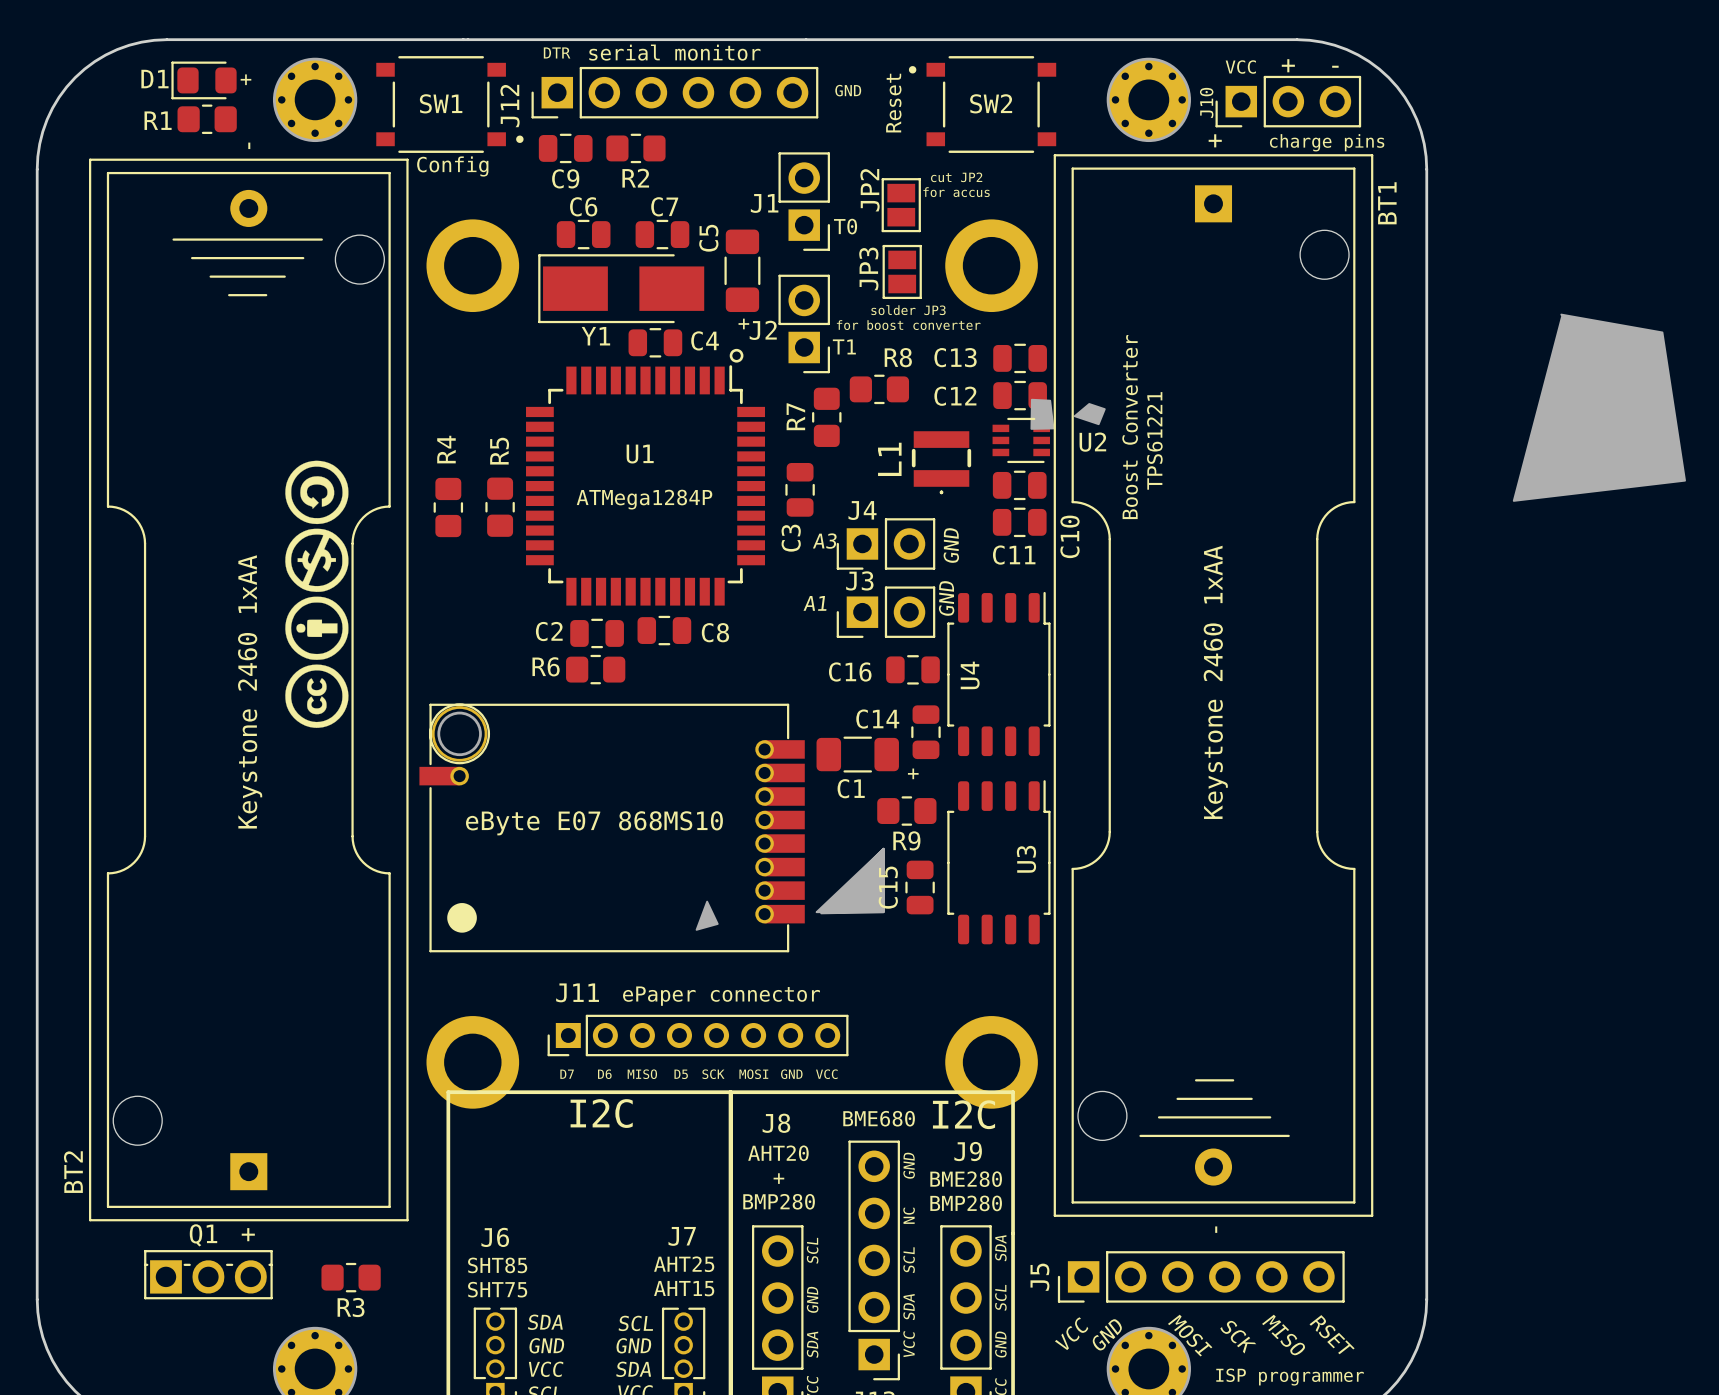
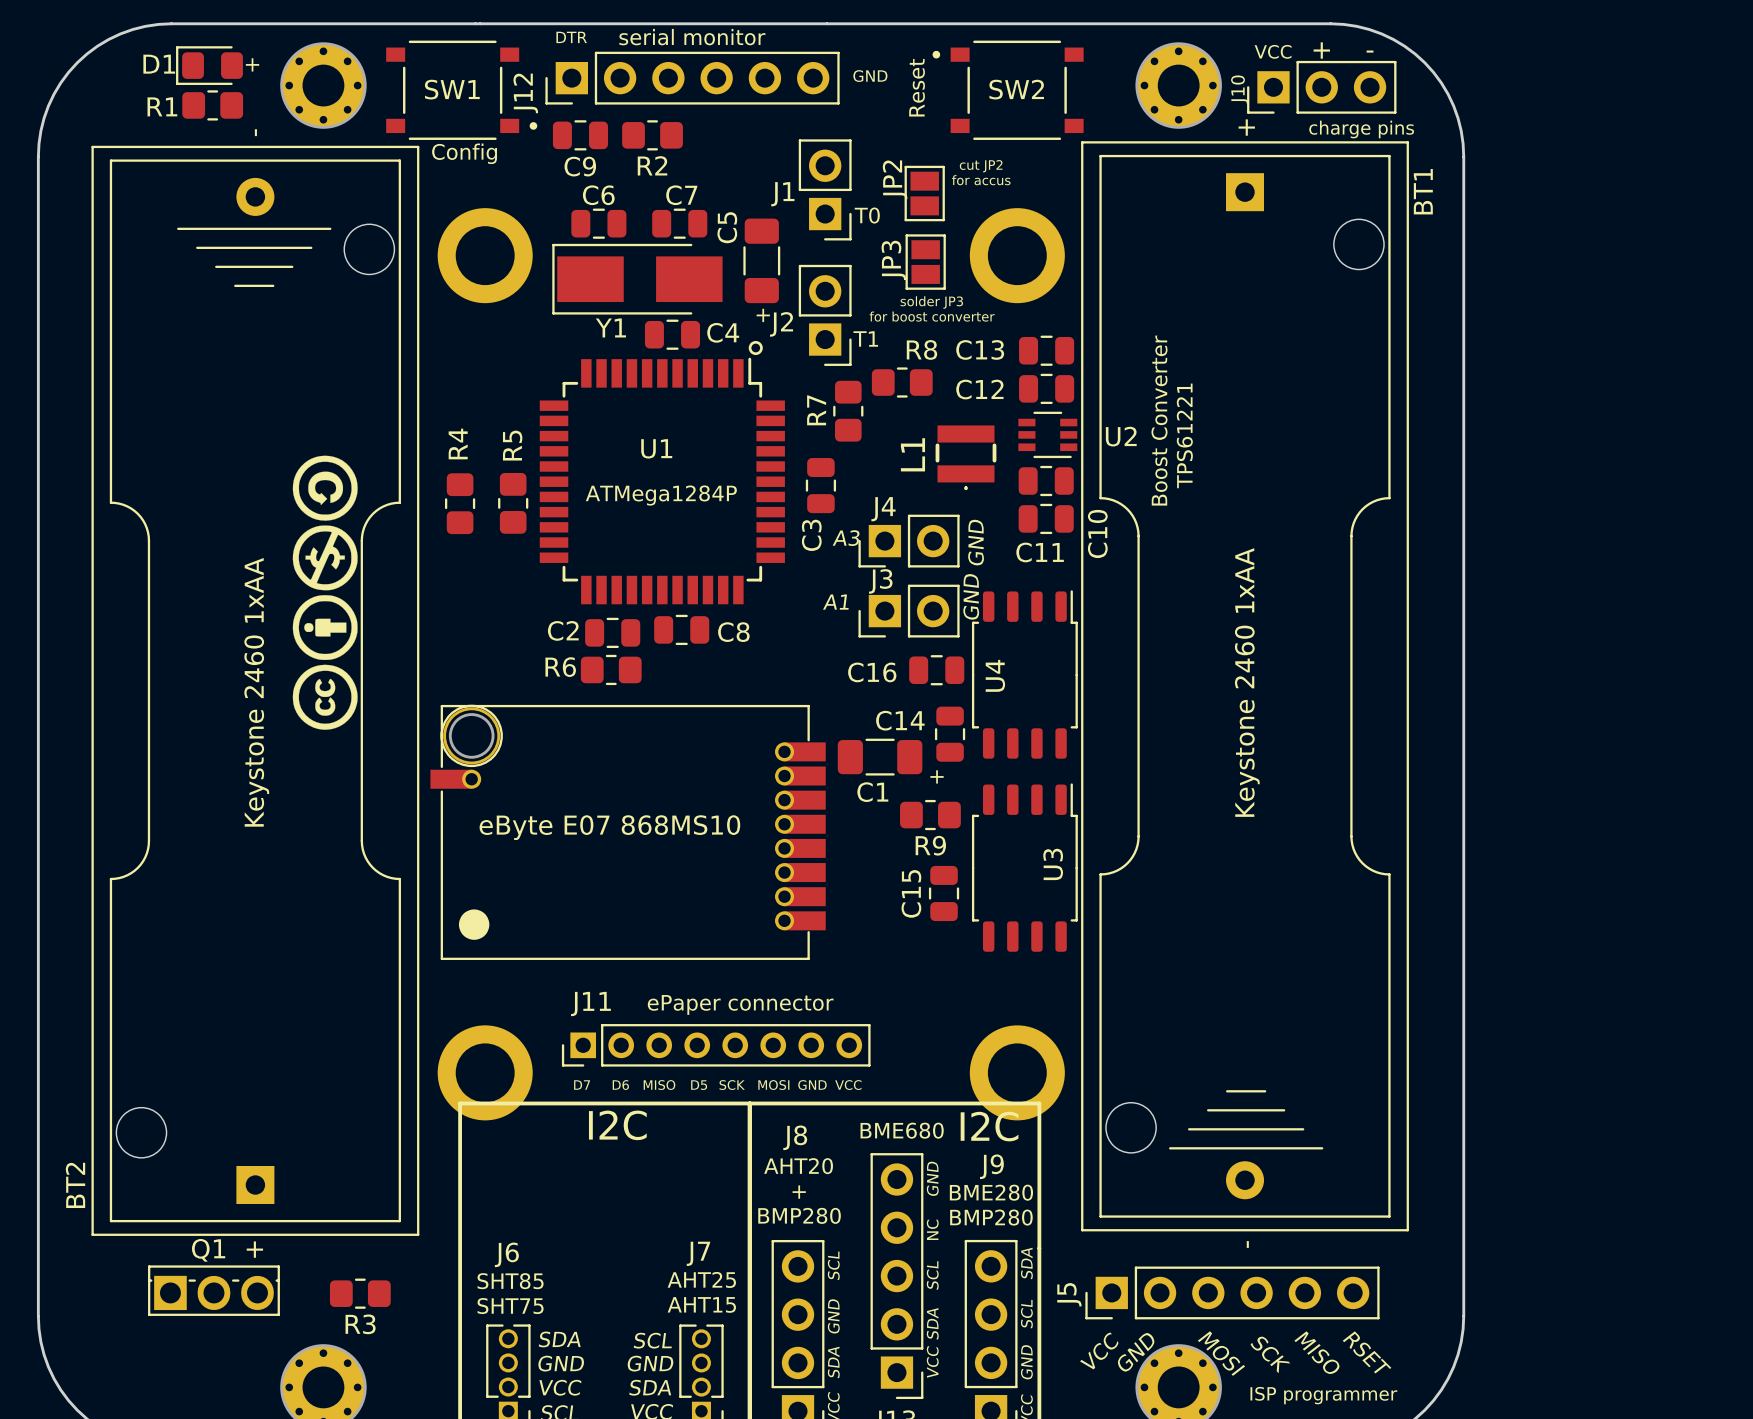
drawing: [1512, 313, 1686, 502] -> none
drawing: [1030, 398, 1106, 430] -> none
drawing: [815, 847, 885, 915] -> none
drawing: [695, 900, 719, 931] -> none

